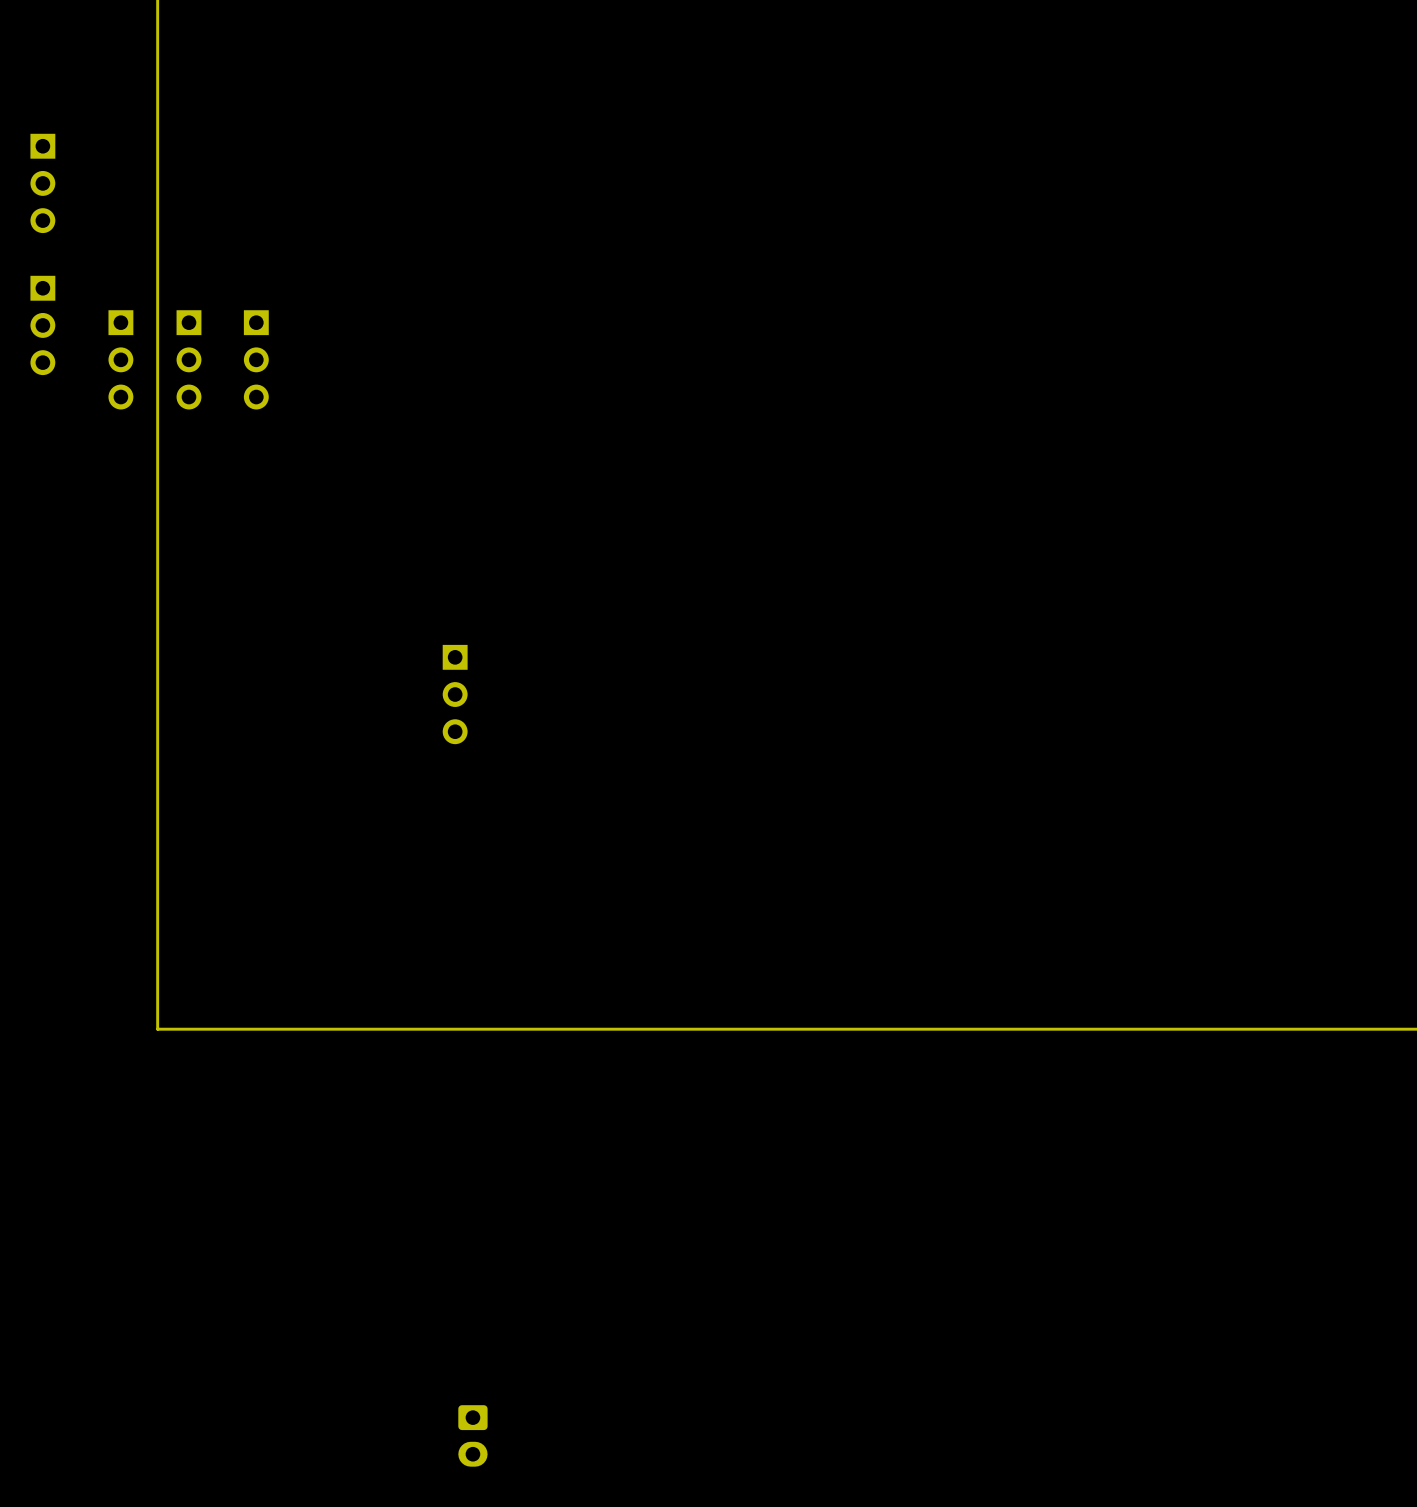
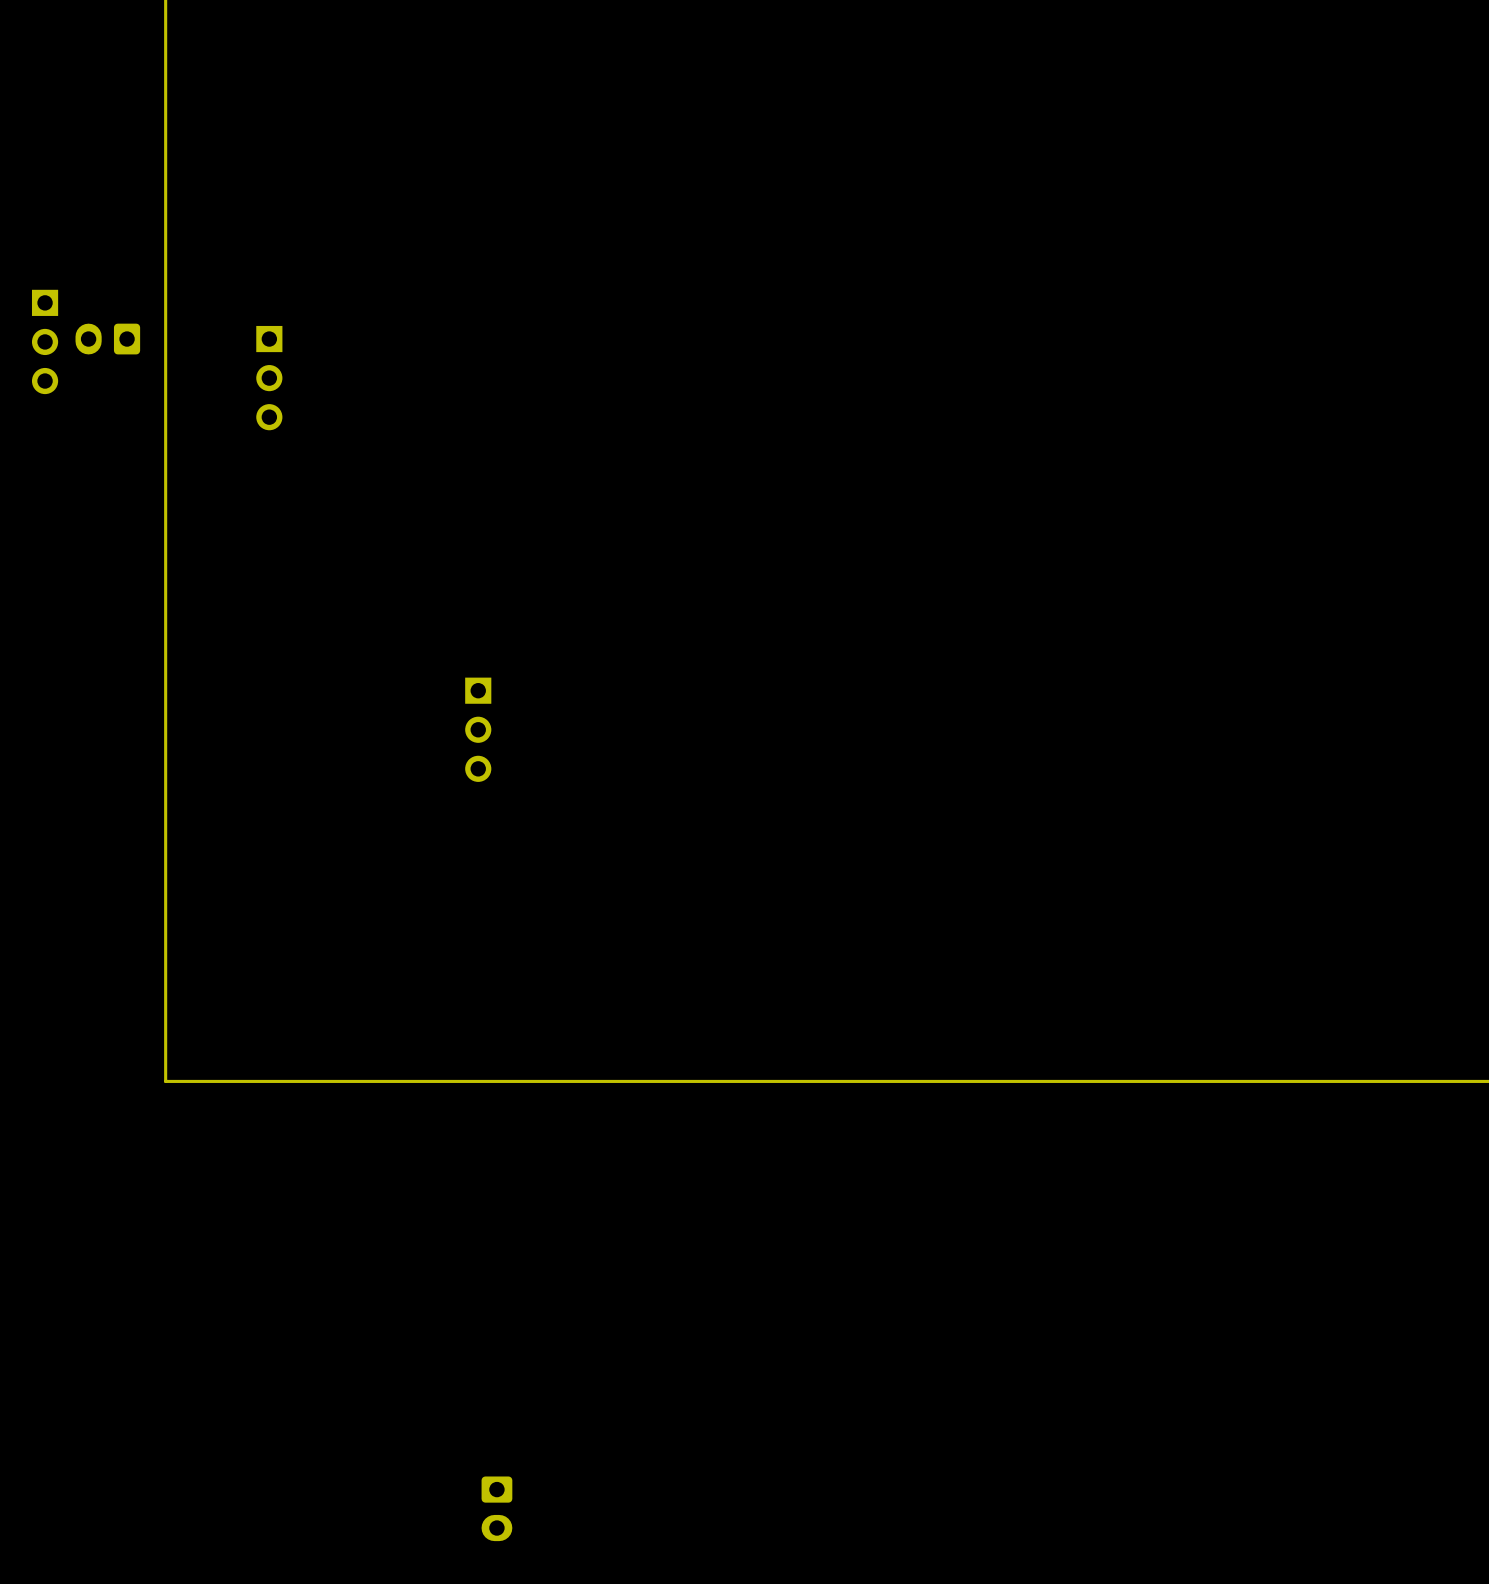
part: (42, 183) -> none
part: none -> (107, 339)
part: (120, 359) -> none
part: (188, 359) -> none

